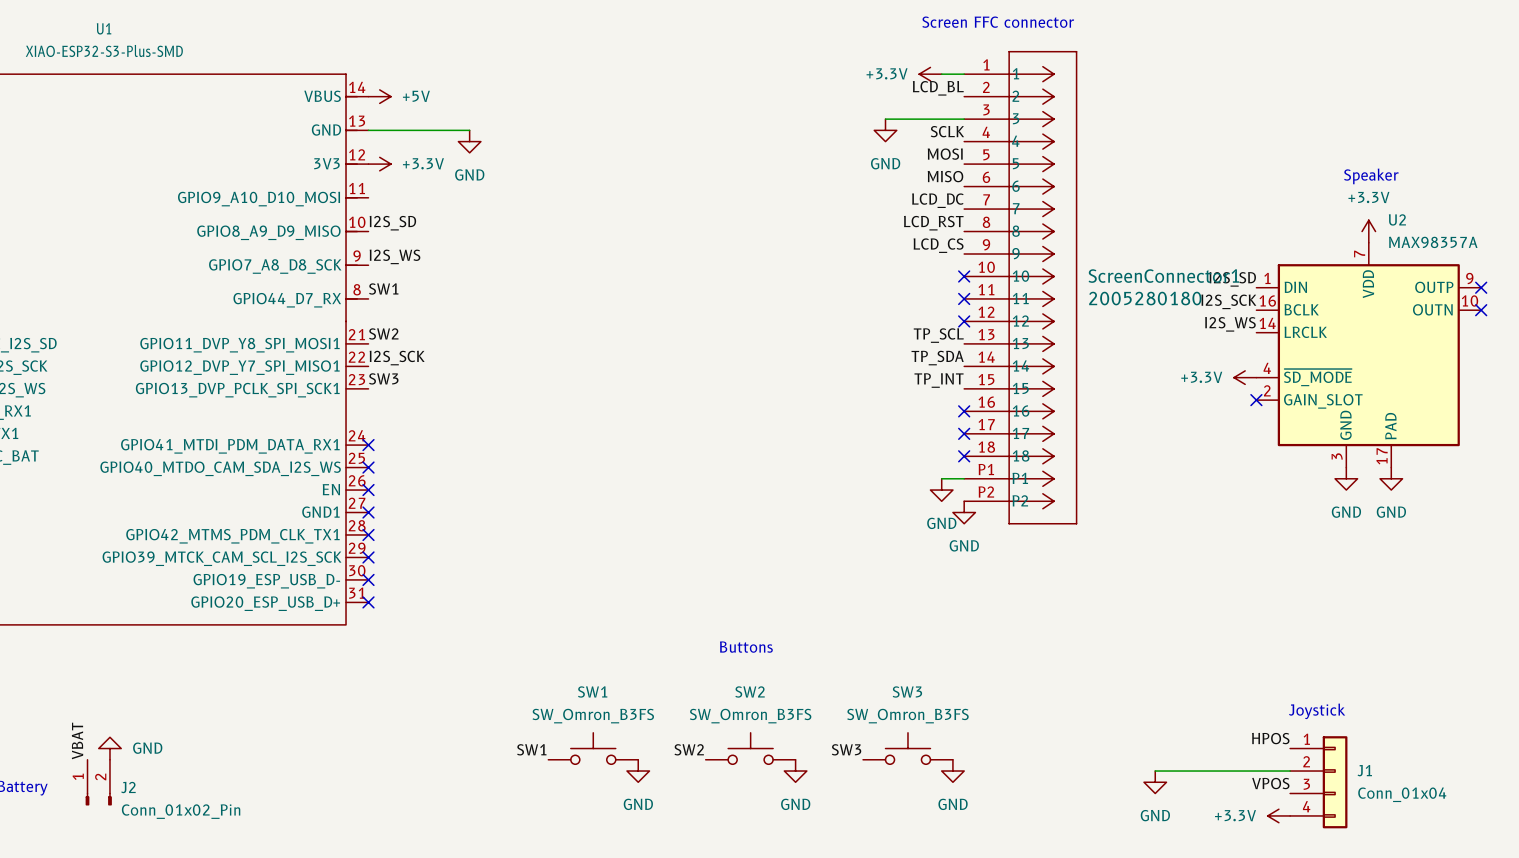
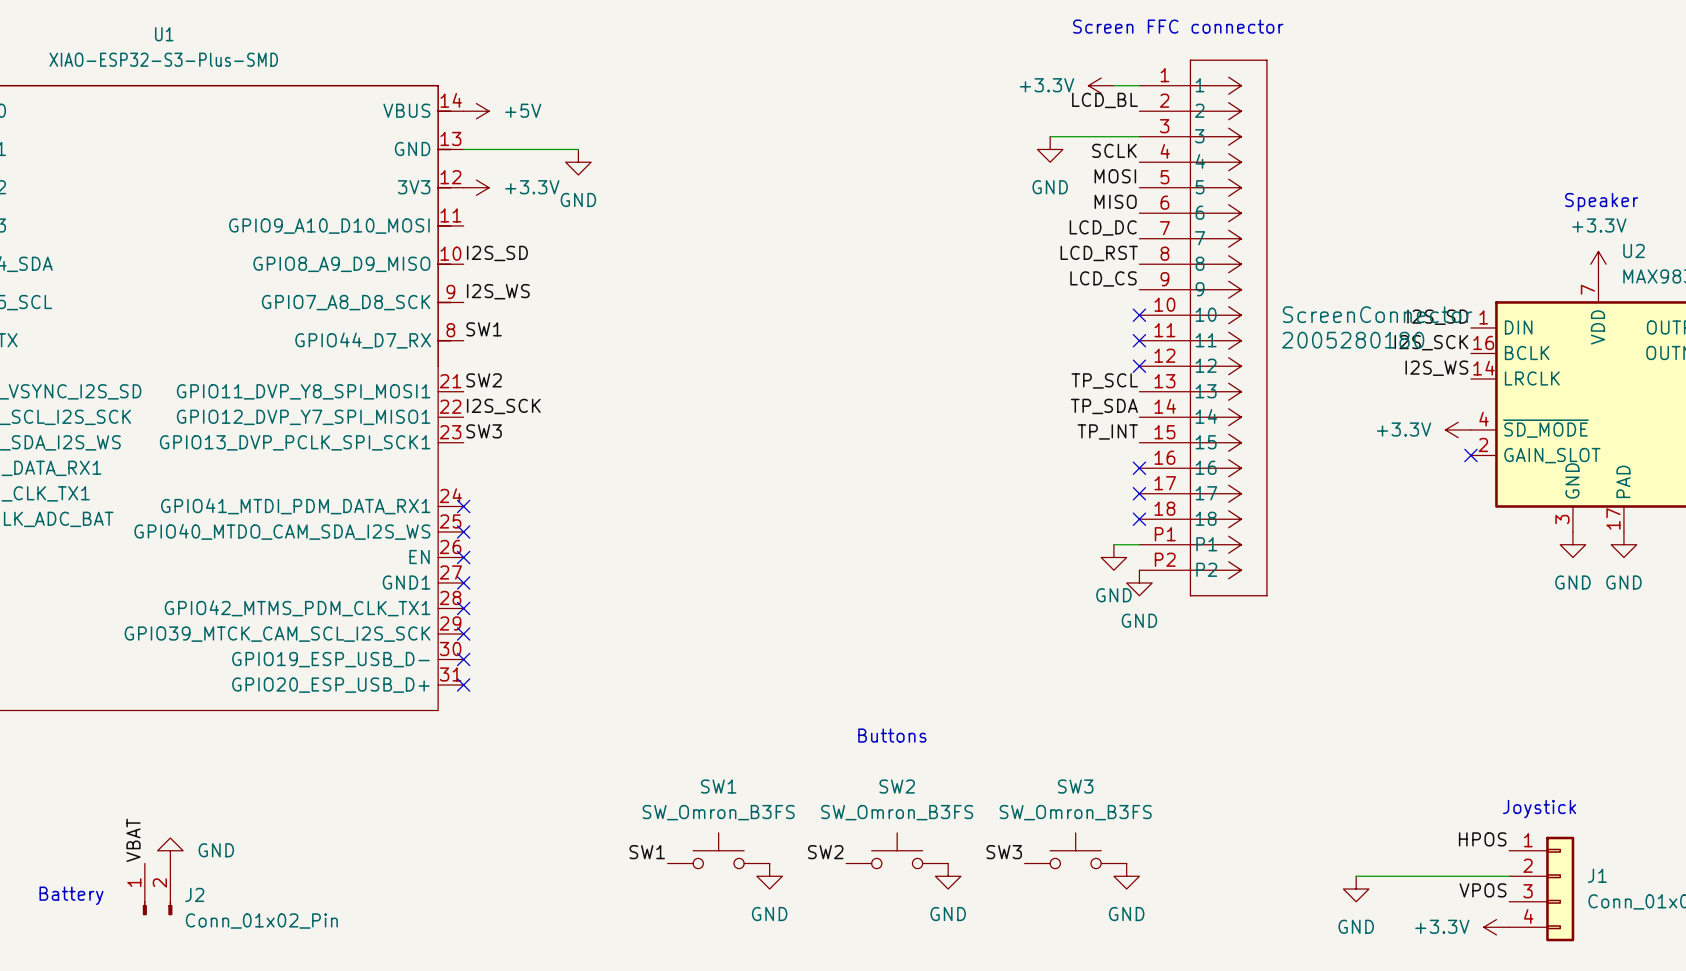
ScreenConnector1 name: ScreenConnector1 (1163, 276) -> ScreenConnector (1377, 314)

